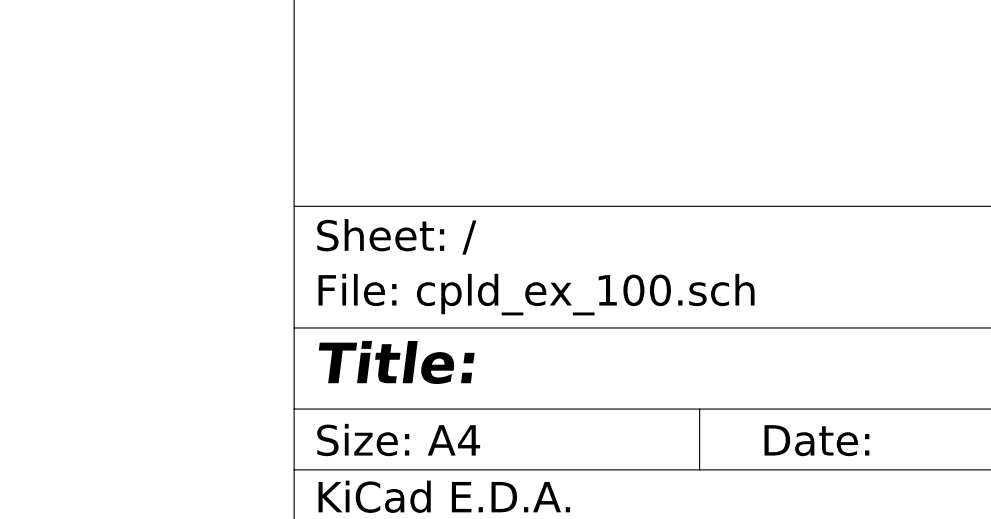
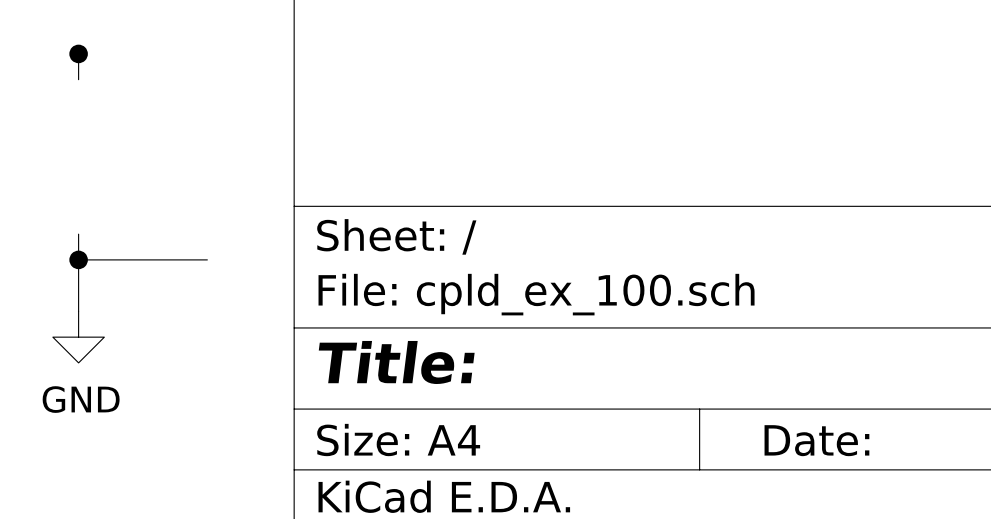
wire: none -> (78, 53) (78, 79)
junction: none -> (78, 53)
wire: none -> (78, 234) (78, 311)
wire: none -> (78, 259) (207, 259)
junction: none -> (78, 259)
power symbol: none -> GND (78, 337)

